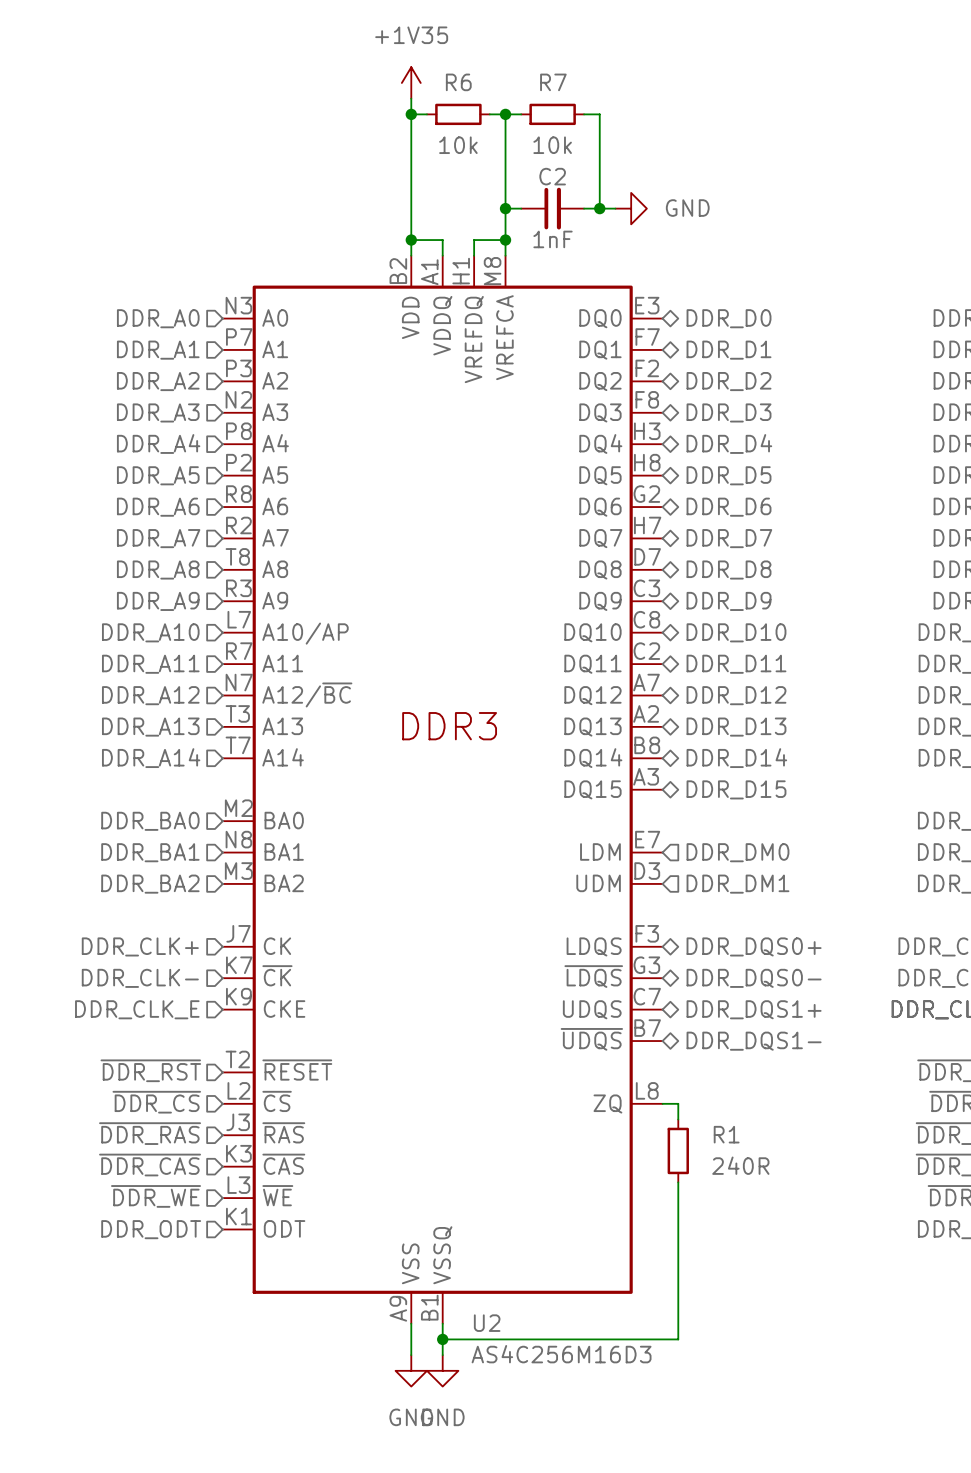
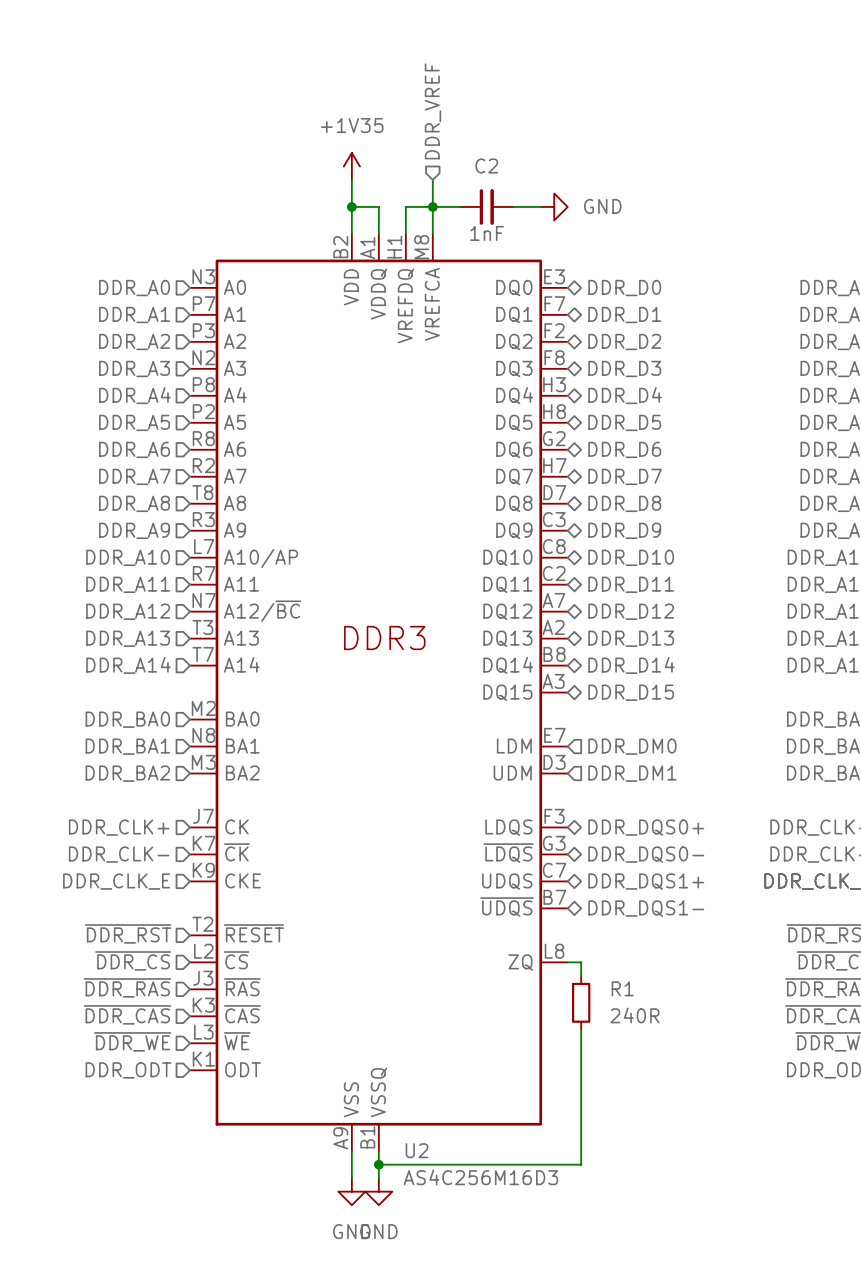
power symbol position: +1V35 (411, 82) -> +1V35 (351, 166)
wire: (411, 98) (411, 192) -> none
hierarchical label: none -> DDR_VREF (432, 111)
wire: (411, 114) (426, 114) -> none
junction: (411, 114) -> none
R6: 10k (458, 114) -> none
wire: (489, 114) (521, 114) -> none
wire: (505, 114) (505, 192) -> none
junction: (505, 114) -> none
R7: 10k (552, 114) -> none
wire: (584, 114) (599, 114) (599, 208) -> none
C2 name position: C2 (552, 176) -> C2 (486, 165)
wire: (505, 208) (521, 208) -> none
junction: (505, 208) -> none
C2 position: (552, 208) -> (486, 206)
wire: (584, 208) (615, 208) -> (513, 206) (540, 206)
junction: (599, 208) -> none
power symbol position: GND (631, 208) -> GND (554, 206)
junction: none -> (432, 206)
wire: (411, 240) (442, 240) -> (351, 206) (378, 206) (378, 220)
junction position: (411, 240) -> (351, 206)
wire: (474, 240) (505, 240) -> (405, 220) (405, 206) (459, 206)
junction: (505, 240) -> none

